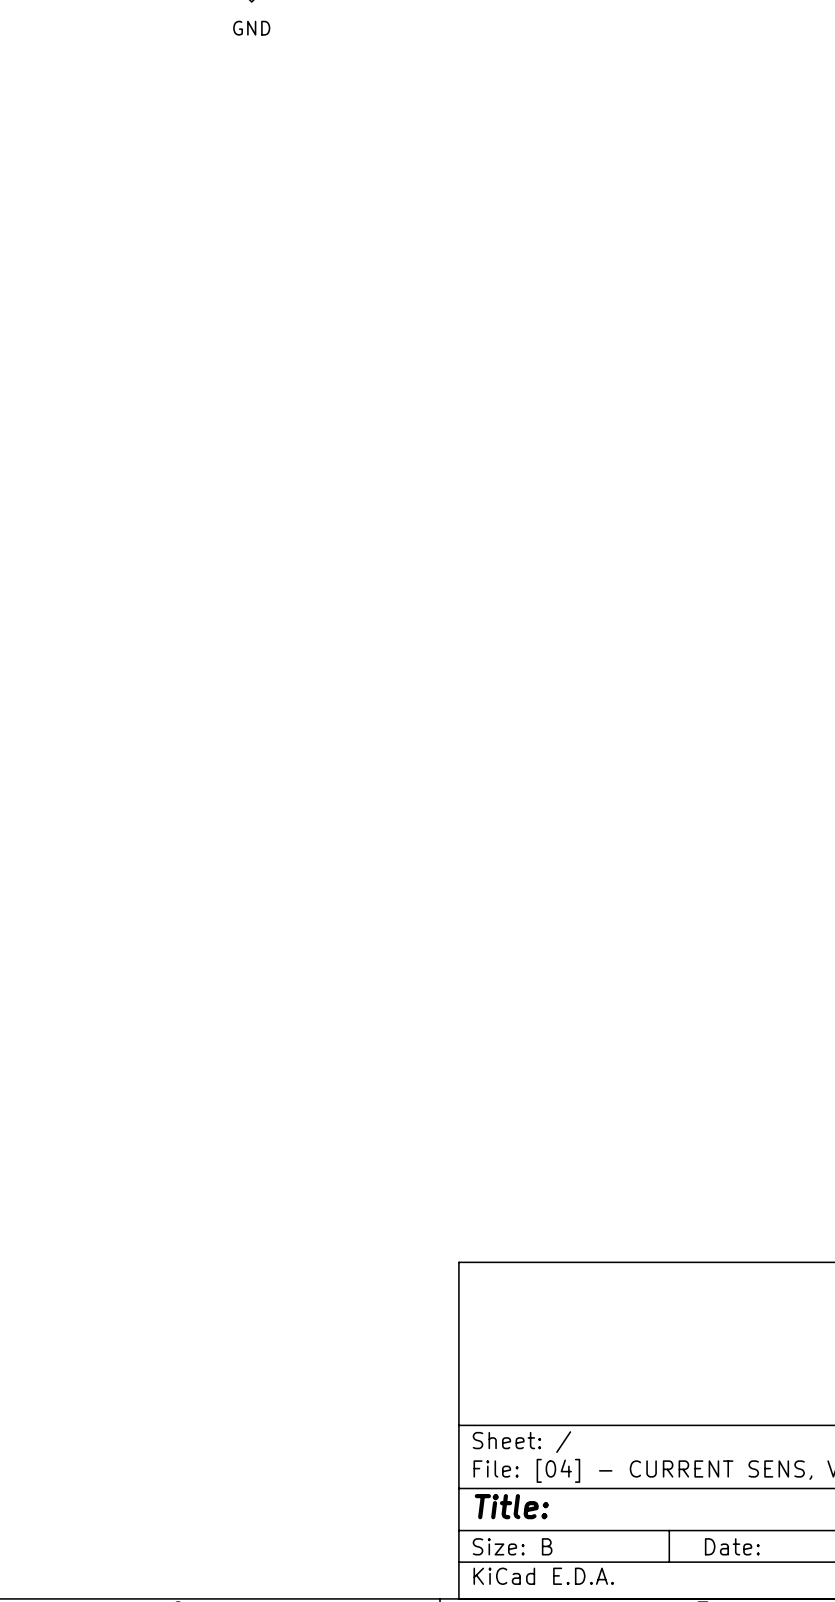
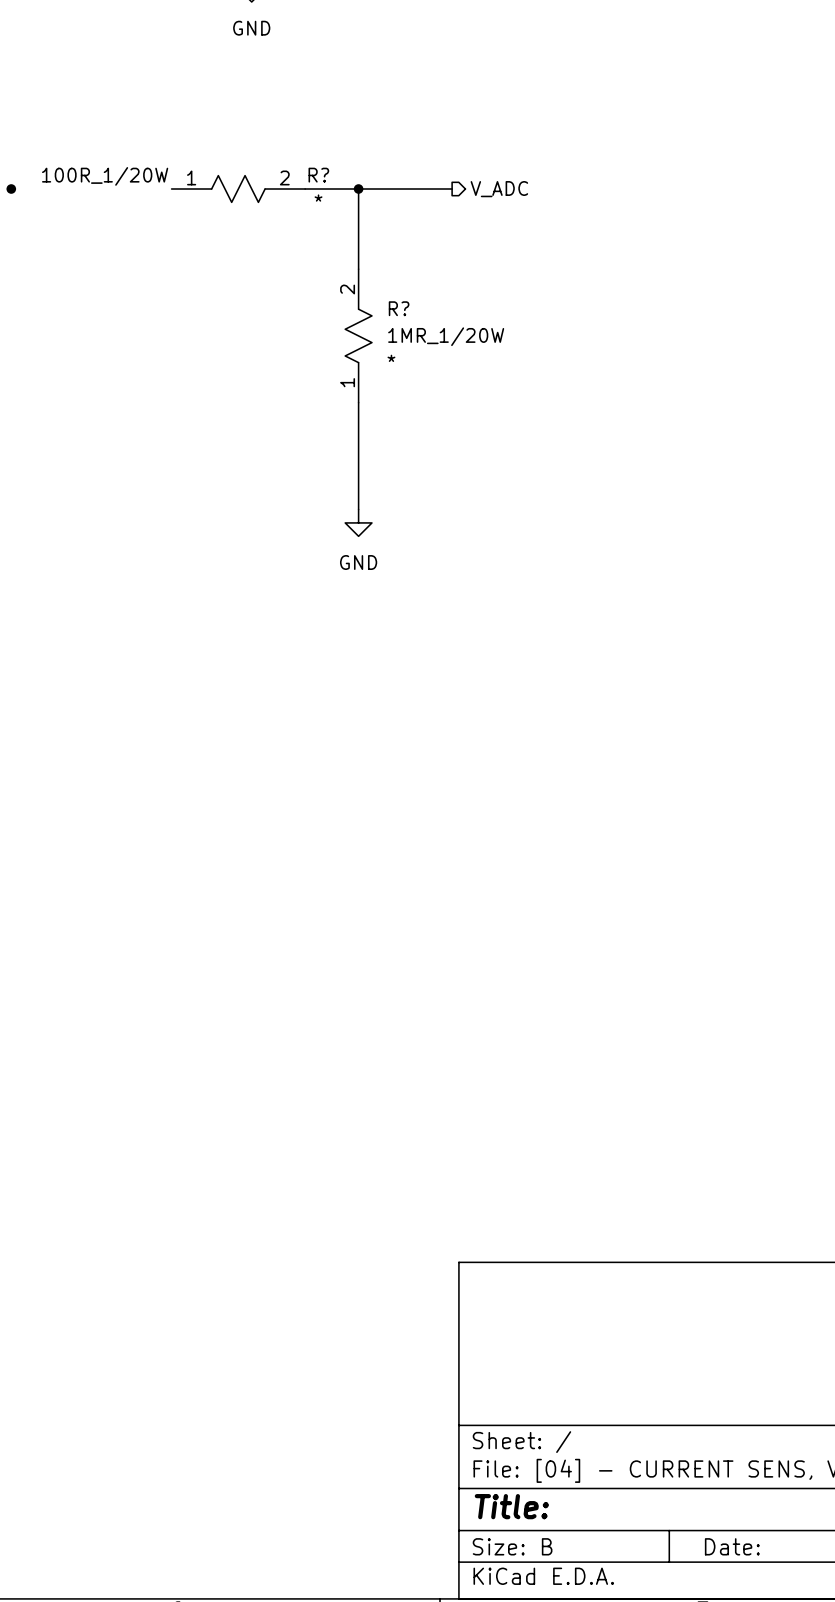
junction: none -> (11, 189)
R?: none -> 100R_1/20W (238, 189)
wire: none -> (305, 189) (452, 189)
wire: none -> (358, 189) (358, 269)
junction: none -> (358, 189)
hierarchical label: none -> V_ADC (499, 189)
R?: none -> 1MR_1/20W (358, 335)
wire: none -> (358, 402) (358, 509)
power symbol: none -> GND (358, 522)

